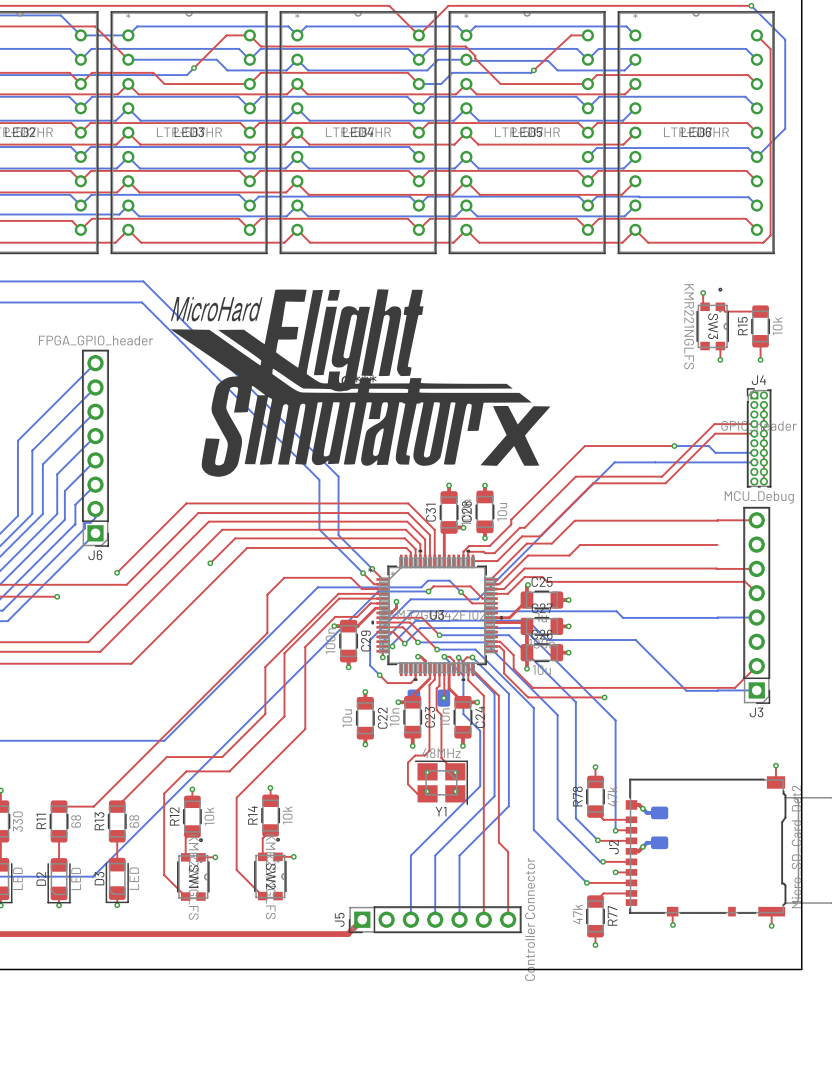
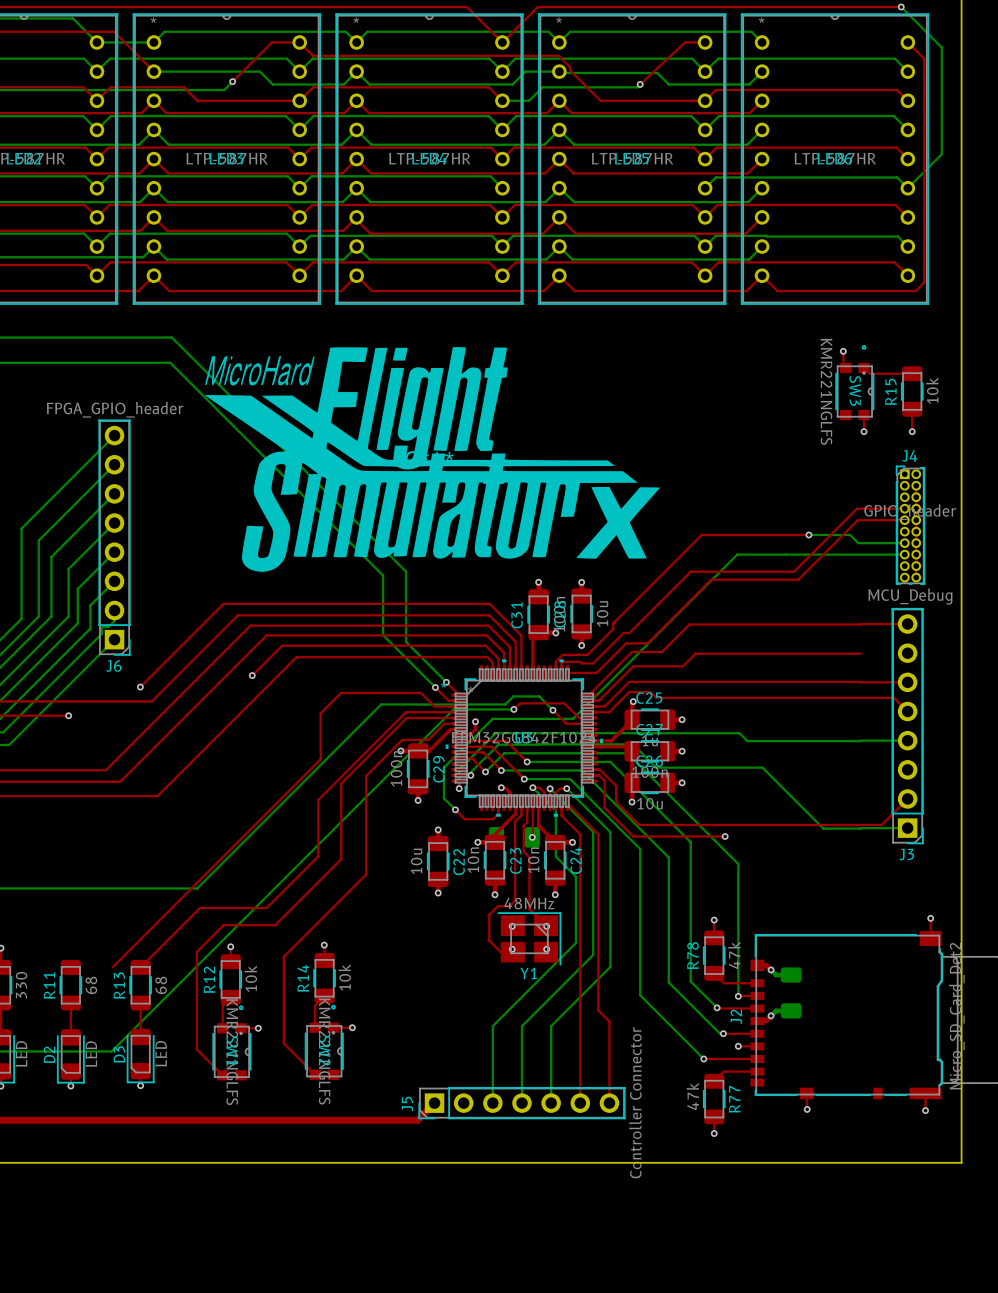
top track: (94, 806) (59, 806) -> none

